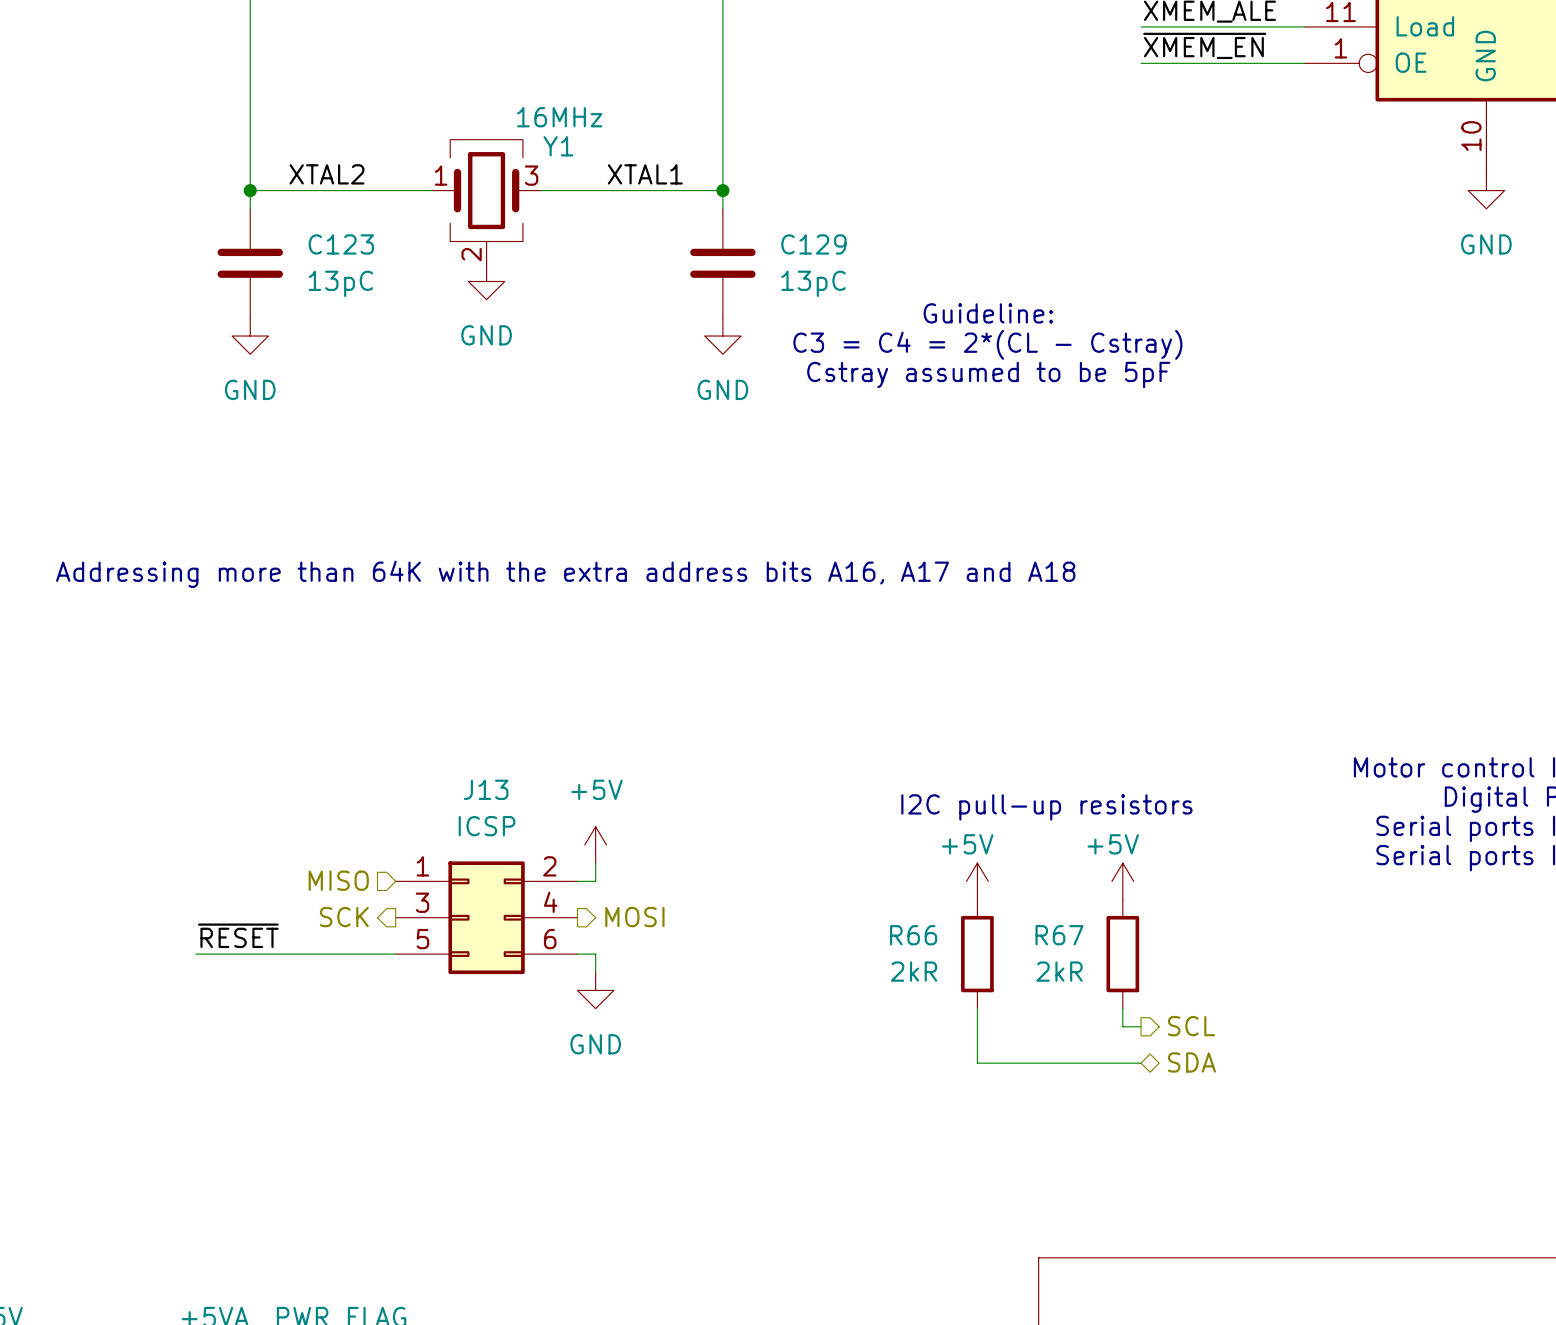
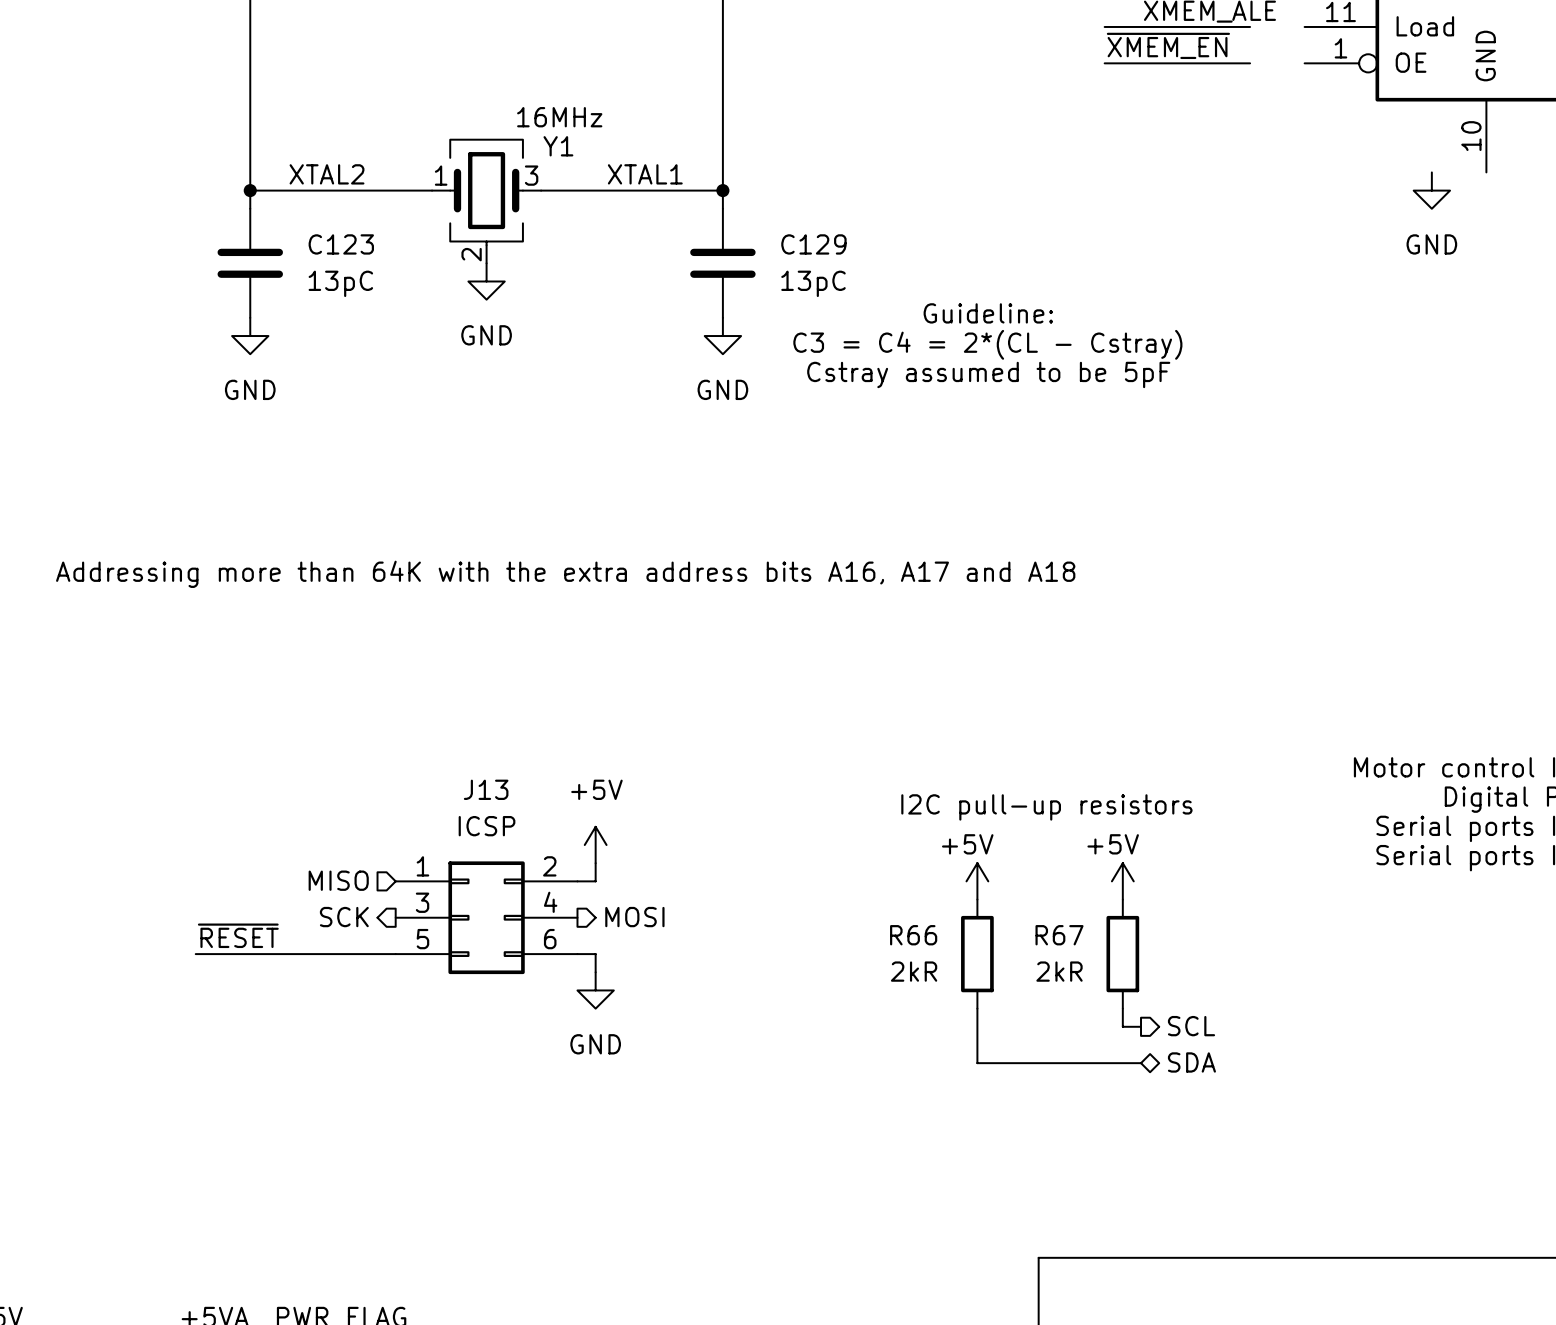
wire: none -> (1104, 26) (1141, 26)
wire: (1250, 26) (1304, 26) -> none
label position: ~{XMEM_EN} (1204, 45) -> ~{XMEM_EN} (1168, 45)
wire: none -> (1104, 63) (1141, 63)
wire: (1250, 63) (1304, 63) -> none
power symbol position: GND (1486, 190) -> GND (1431, 190)

